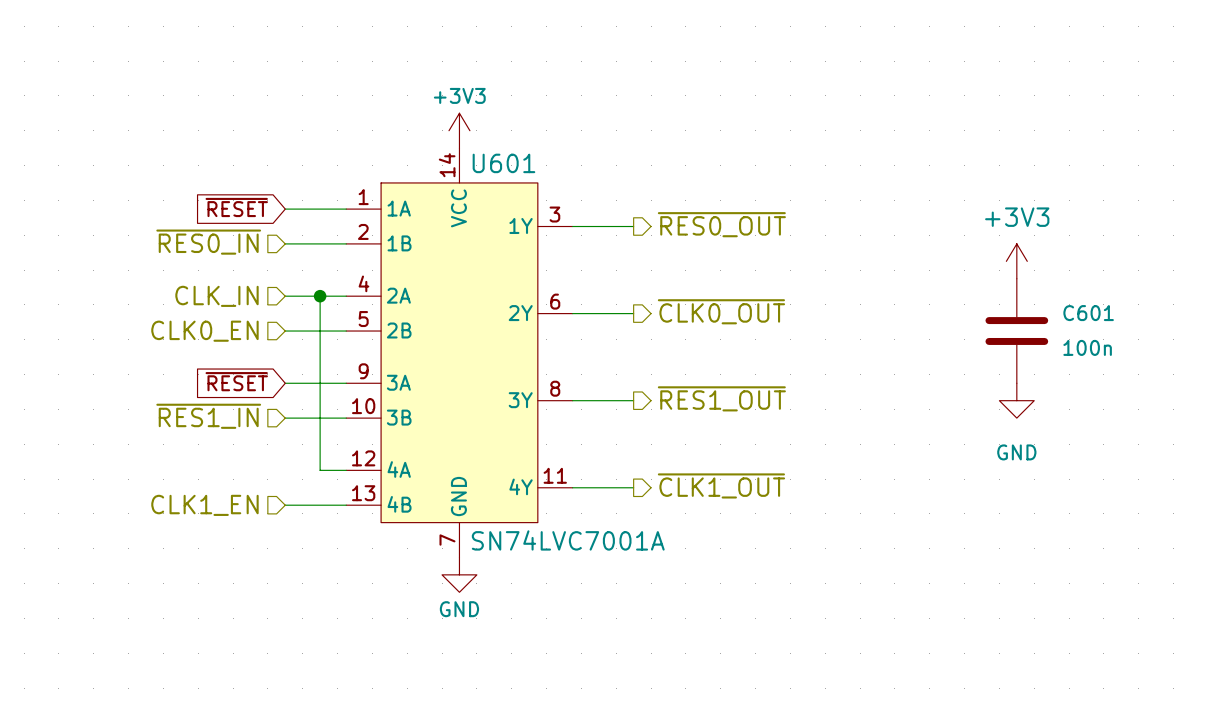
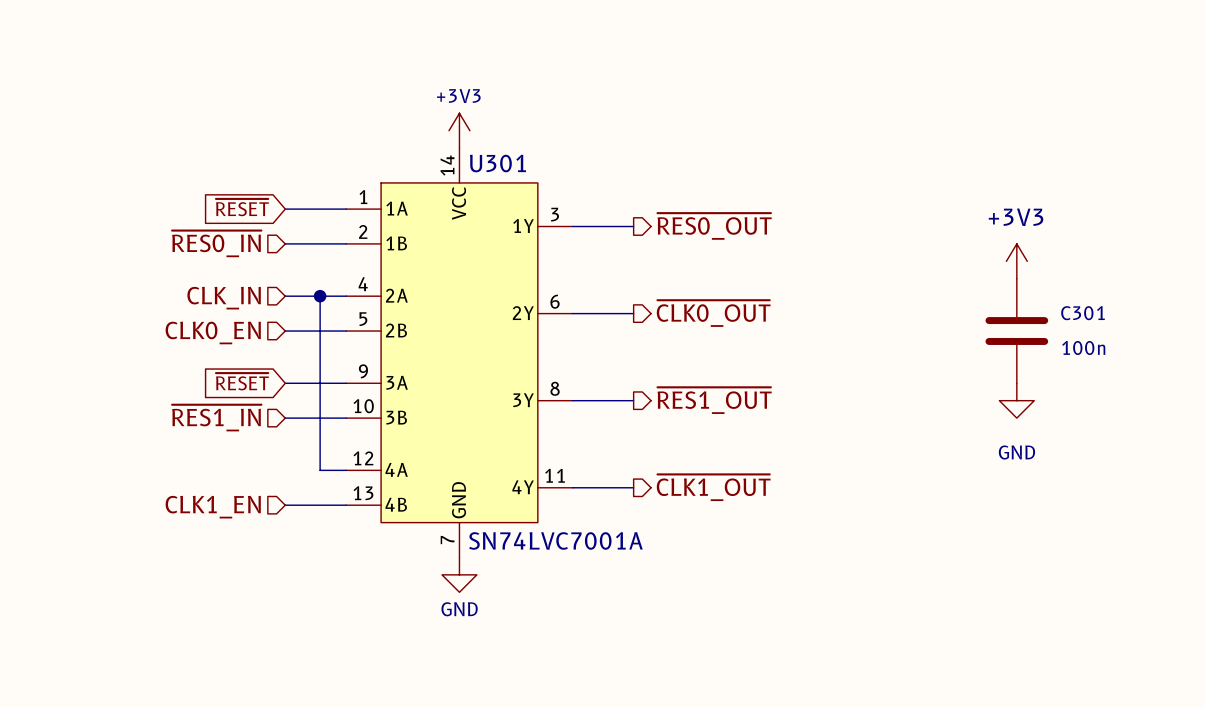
U601 name: U601 (503, 163) -> U301 (497, 163)
C601 name: C601 (1088, 313) -> C301 (1083, 313)

